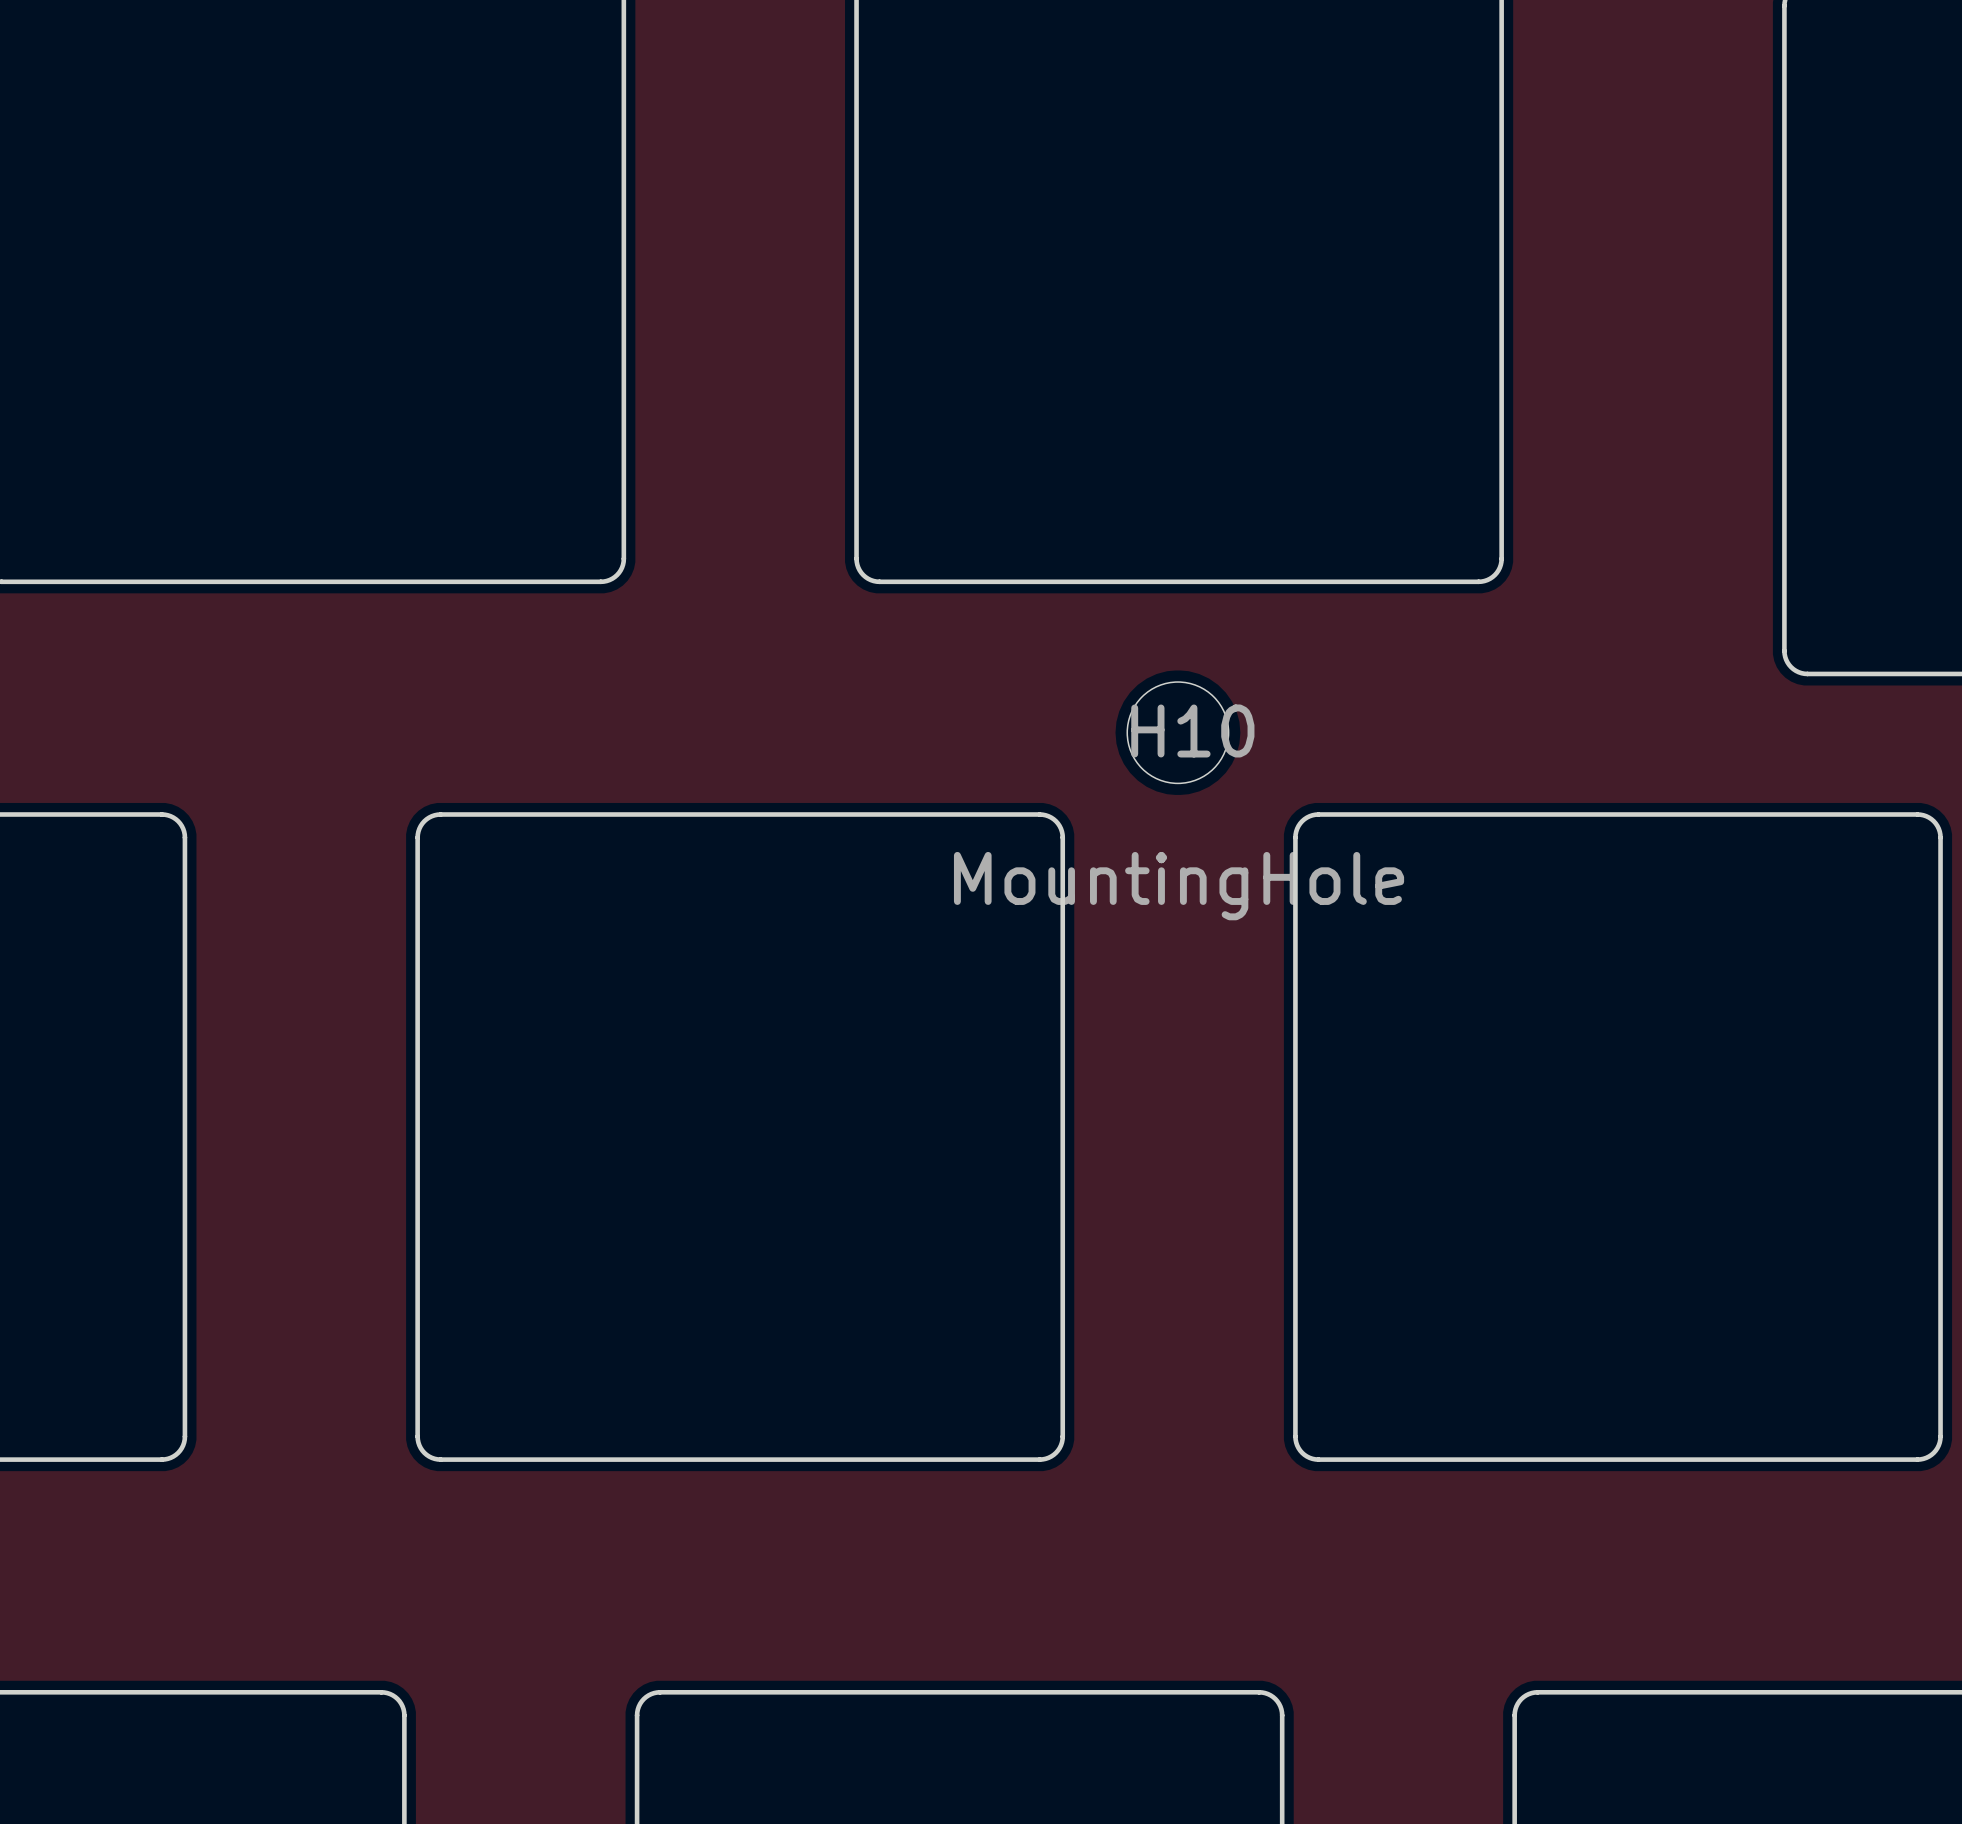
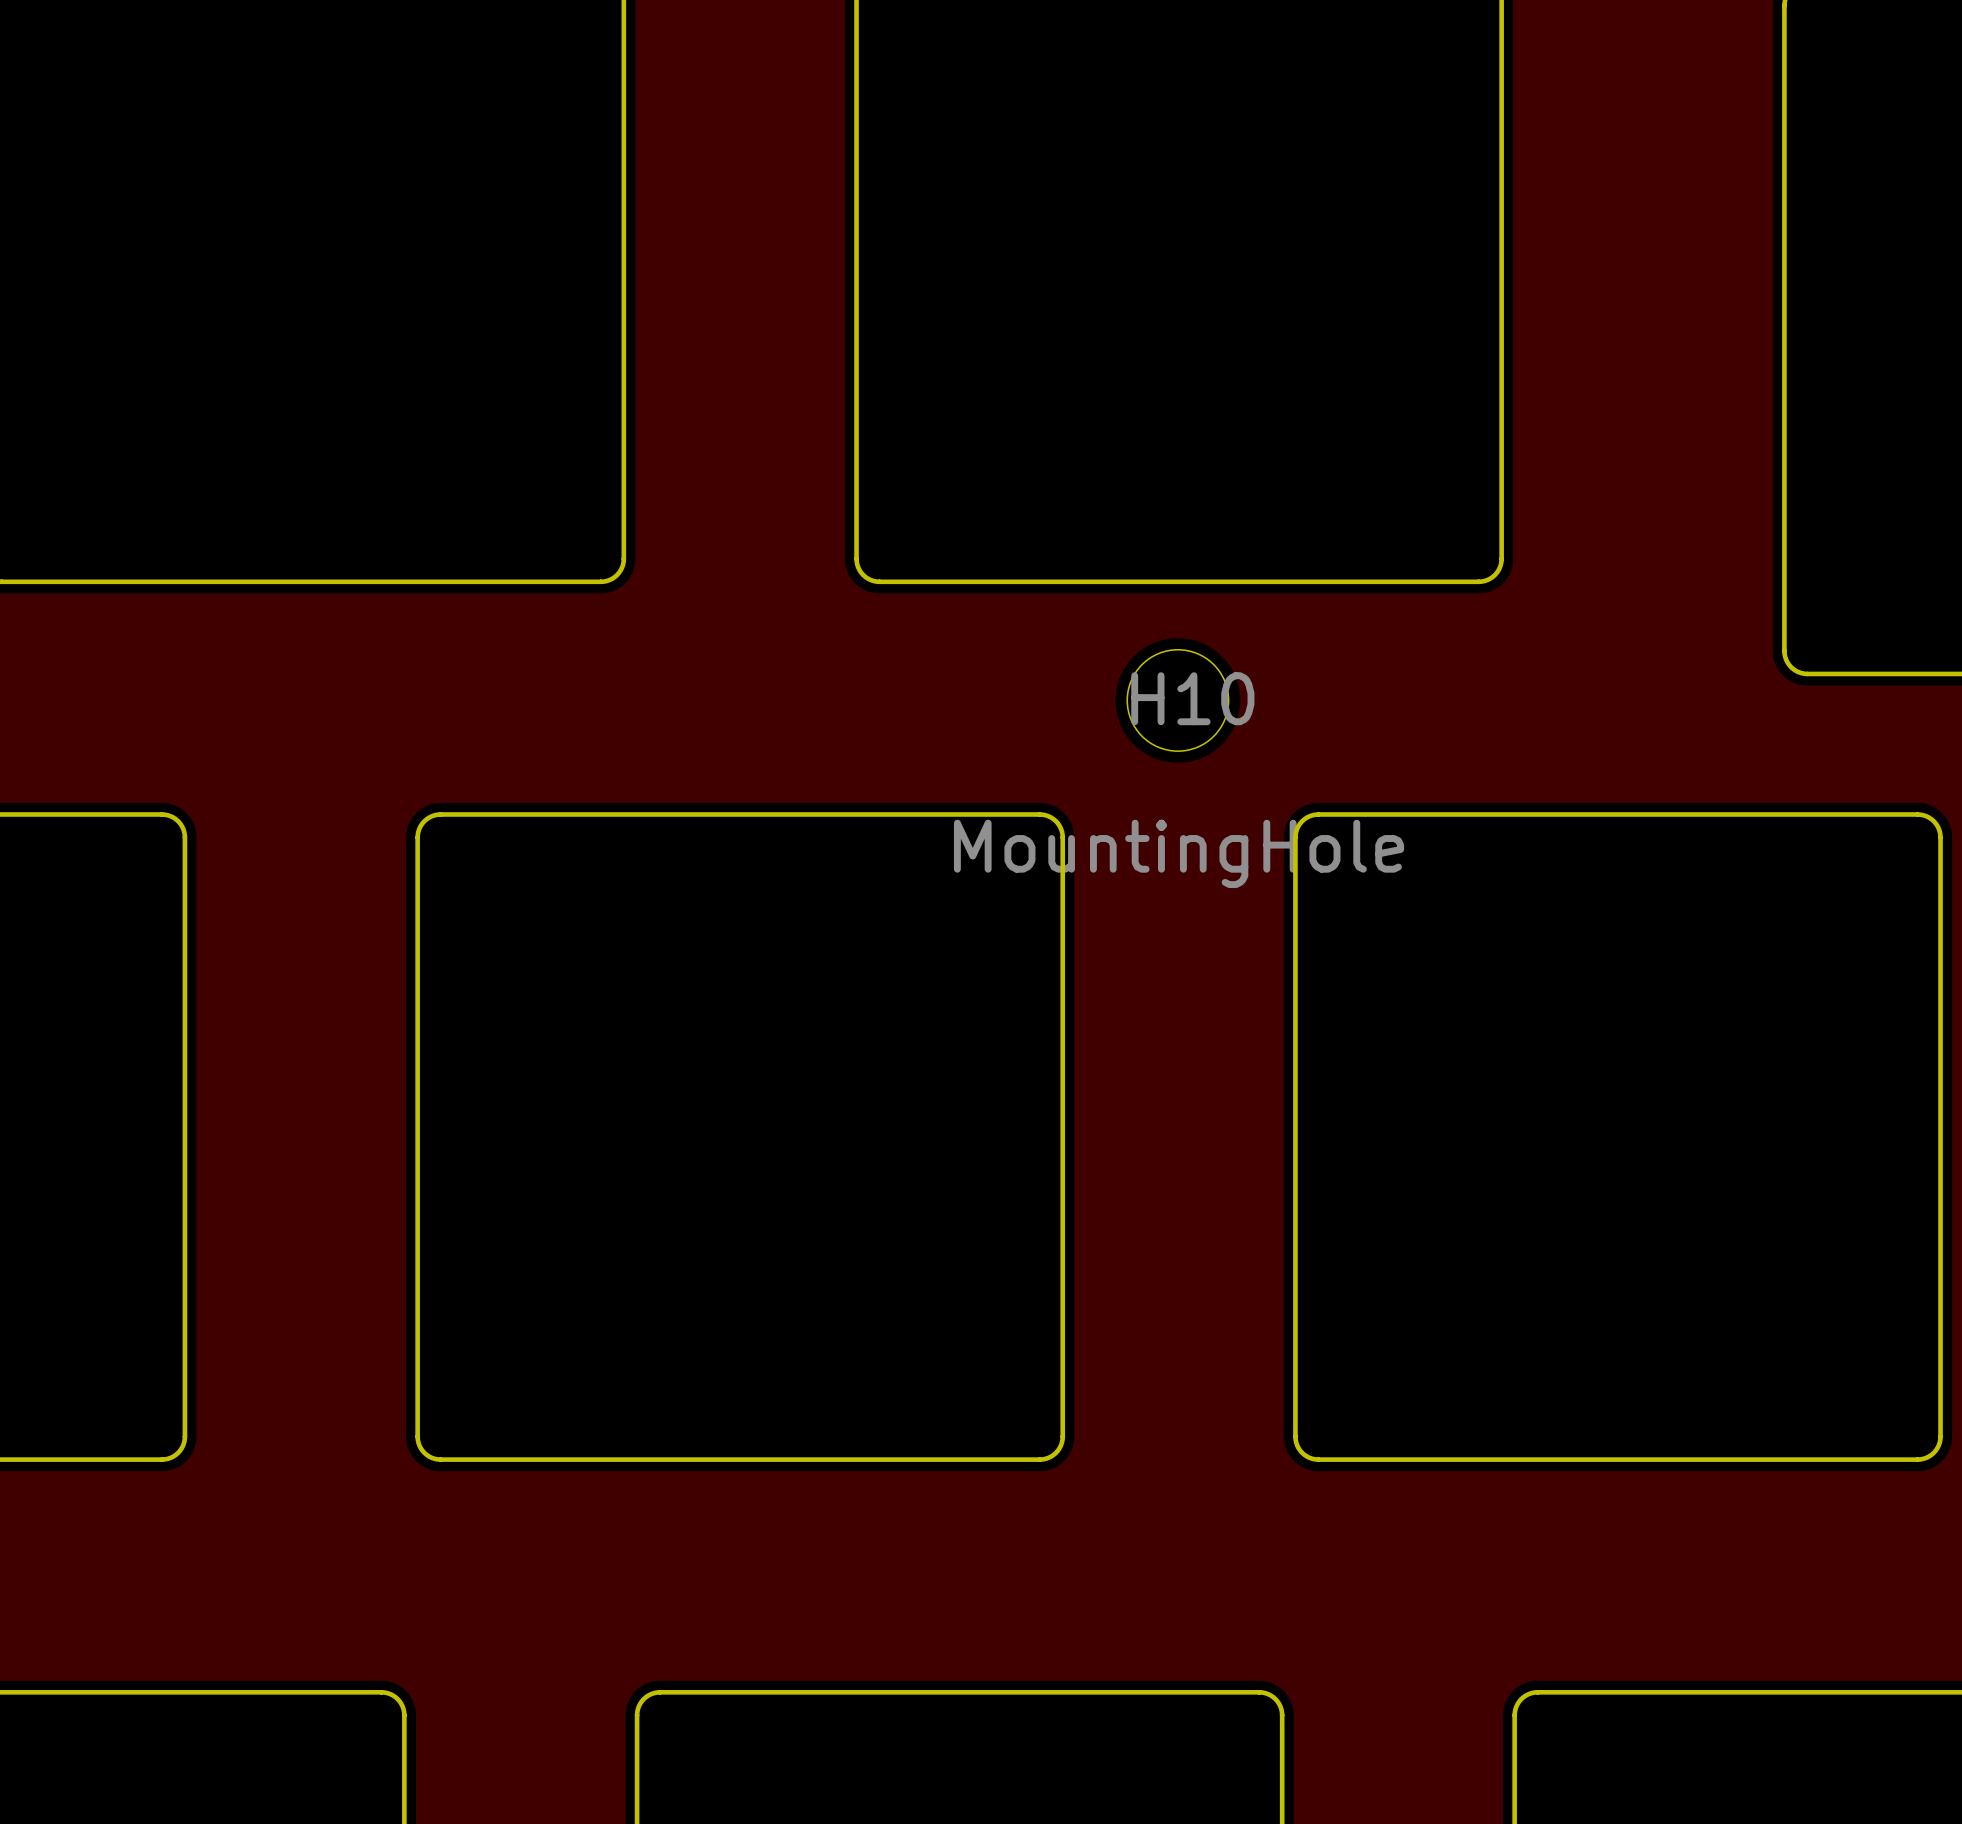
H10 position: (1177, 732) -> (1177, 700)

